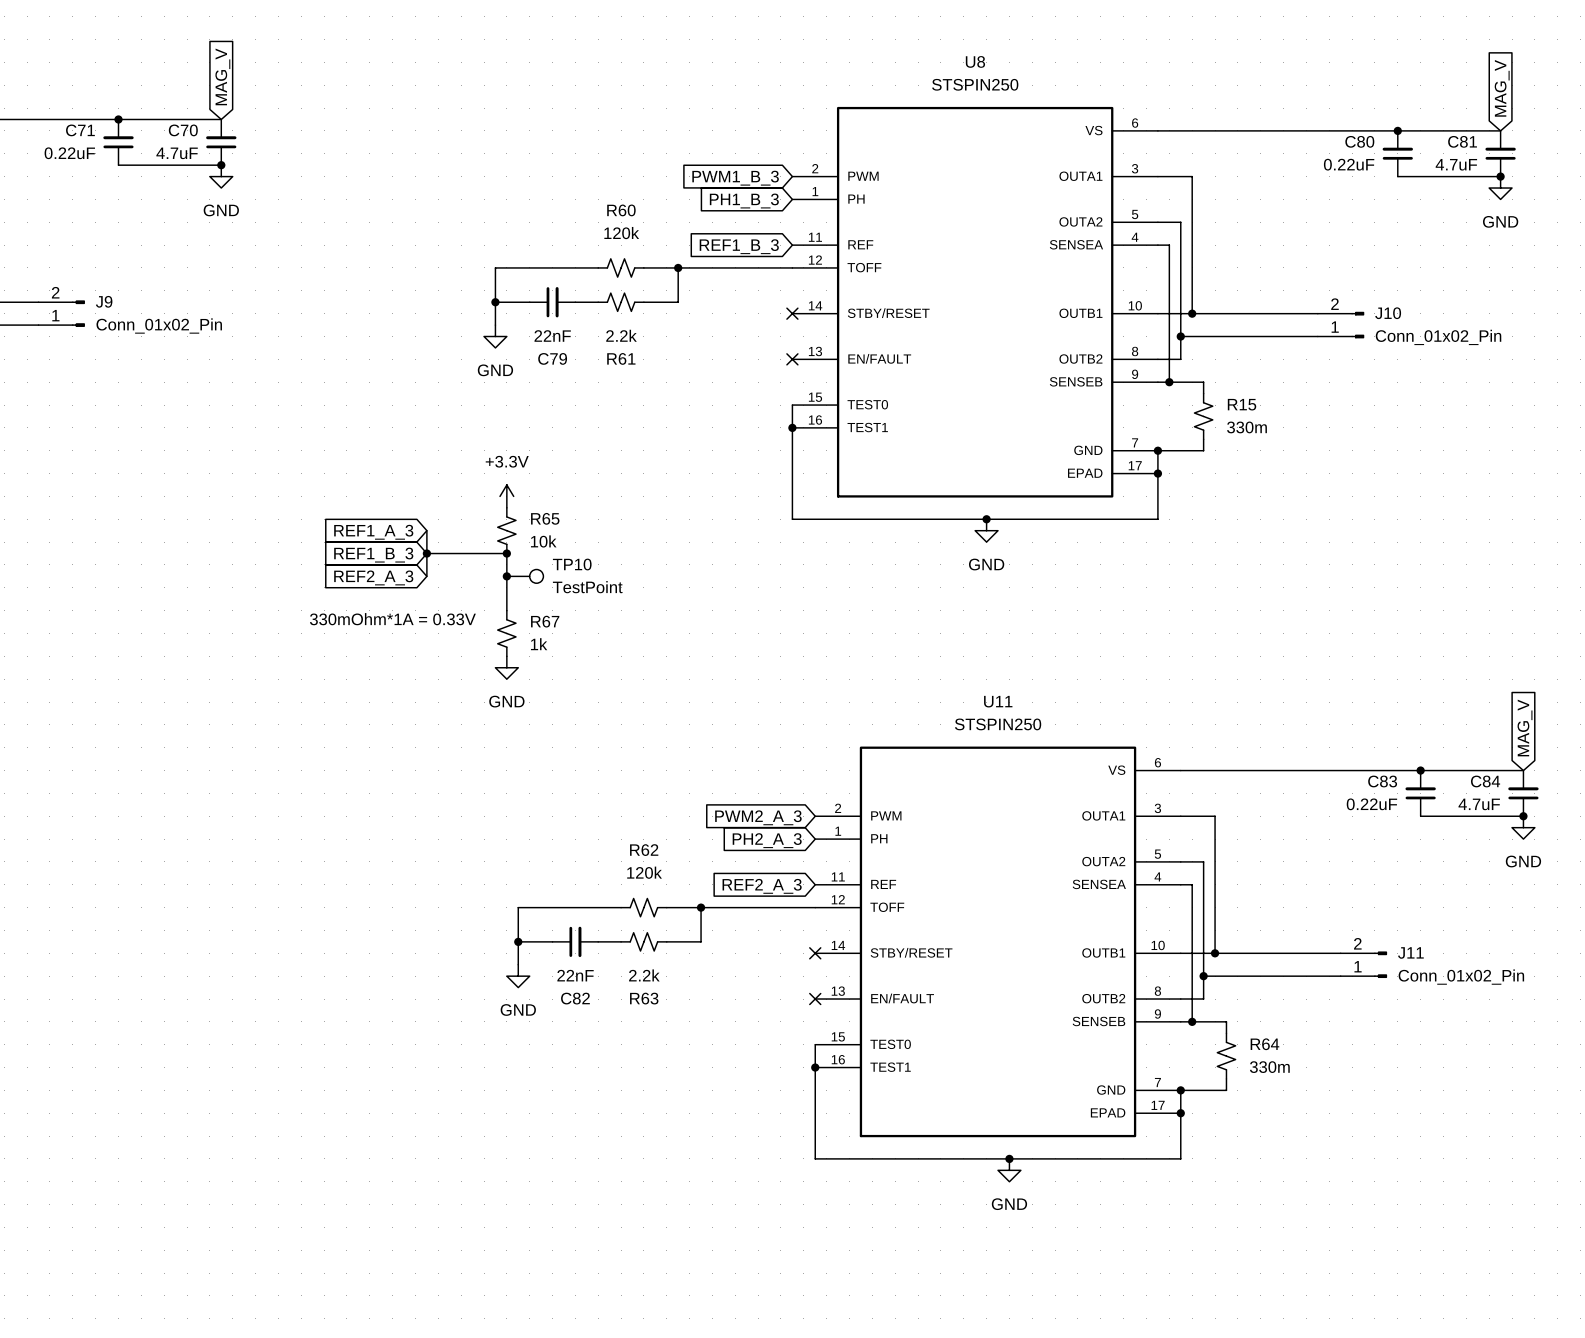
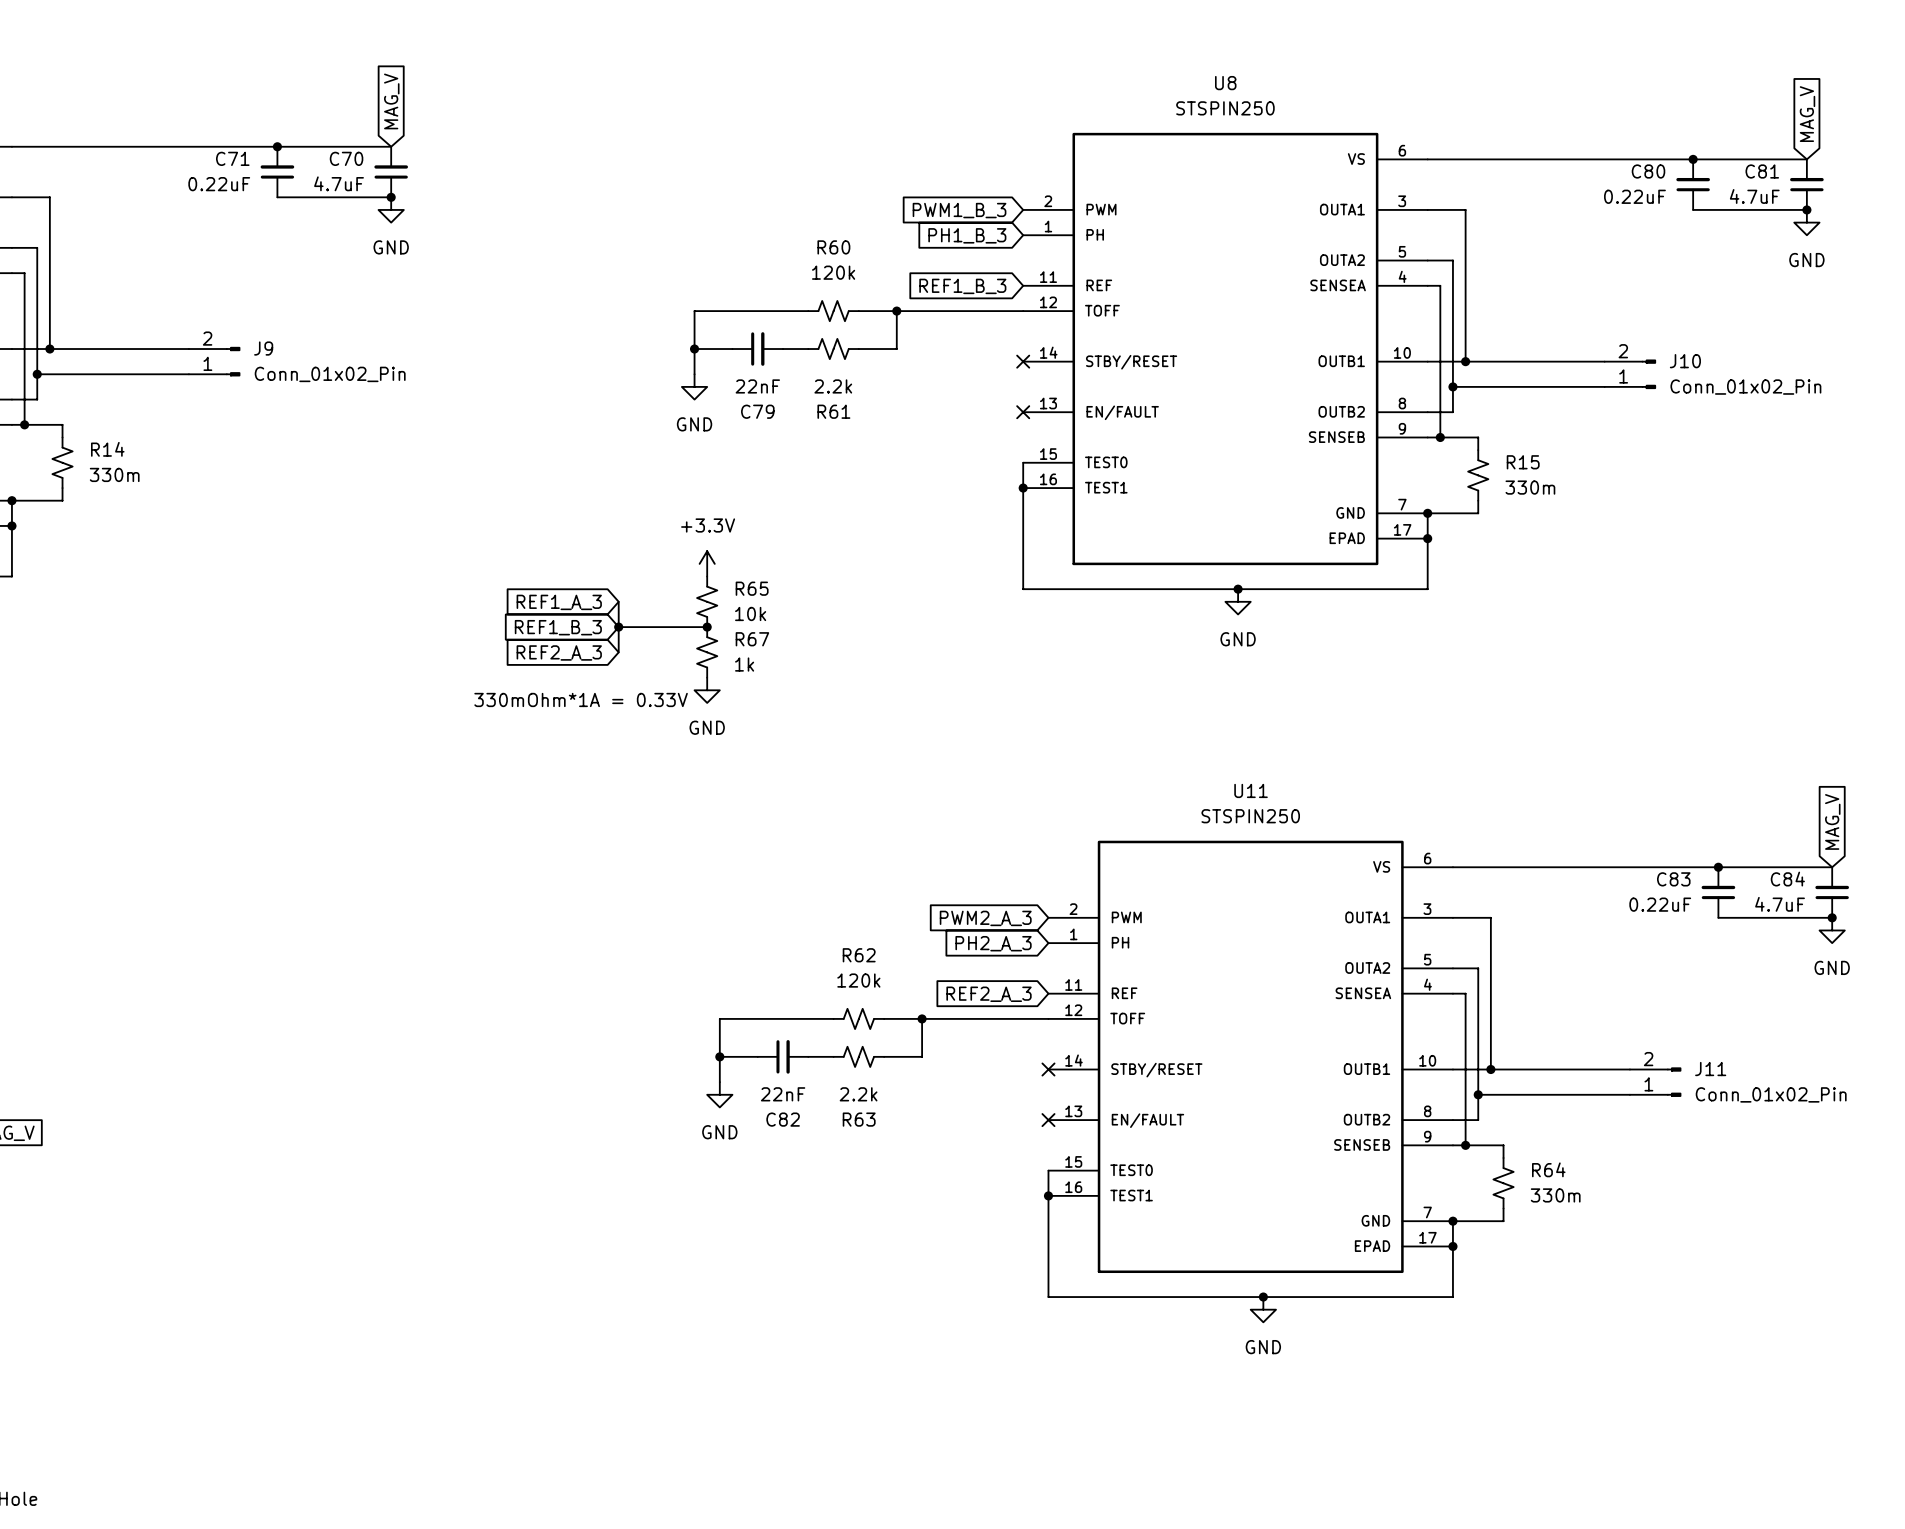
junction: (506, 576) -> none
TP10: TestPoint (525, 576) -> none
R67 position: (506, 633) -> (707, 652)
power symbol position: GND (506, 667) -> GND (707, 690)

